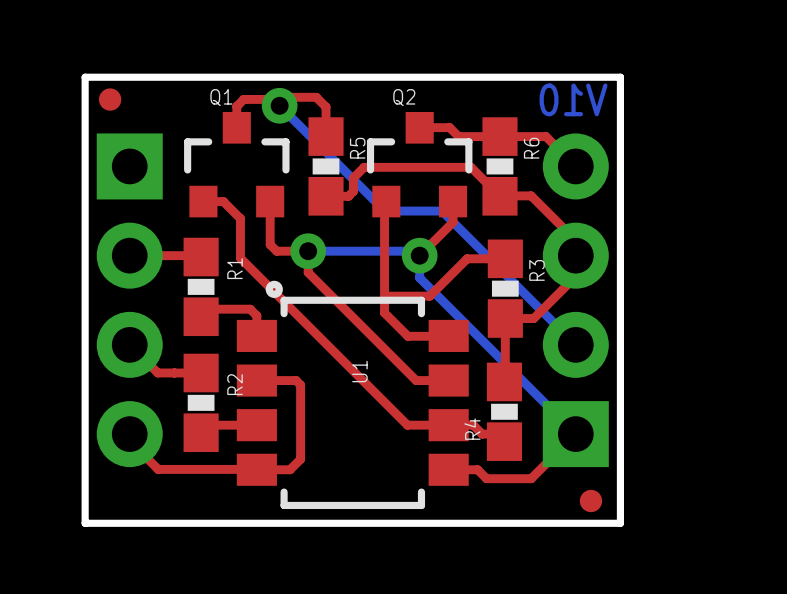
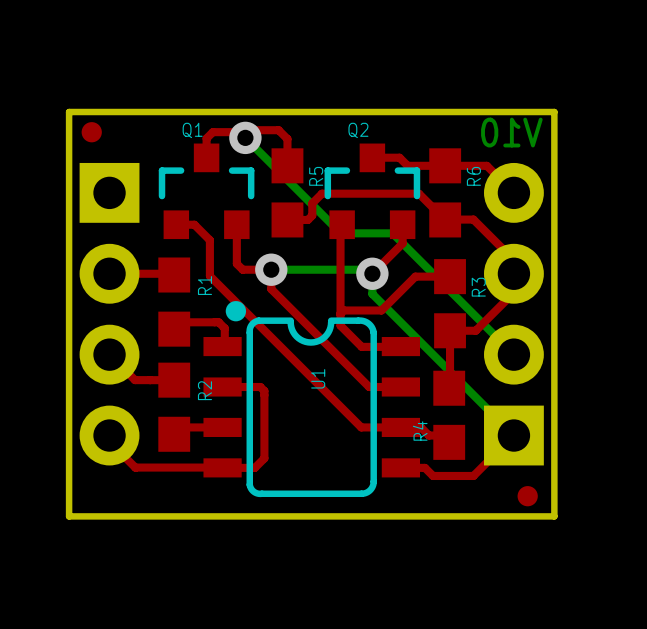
R5 footprint: [308, 117, 344, 216] -> [271, 148, 304, 238]
R6 footprint: [482, 117, 518, 216] -> [429, 148, 462, 238]
R1 footprint: [183, 237, 219, 337] -> [158, 257, 191, 347]
R3 footprint: [487, 239, 523, 338] -> [434, 259, 466, 349]
U1 footprint: [236, 280, 469, 510] -> [203, 301, 421, 498]
R2 footprint: [183, 353, 219, 453] -> [158, 362, 191, 452]
R4 footprint: [486, 362, 523, 461] -> [433, 370, 466, 460]

